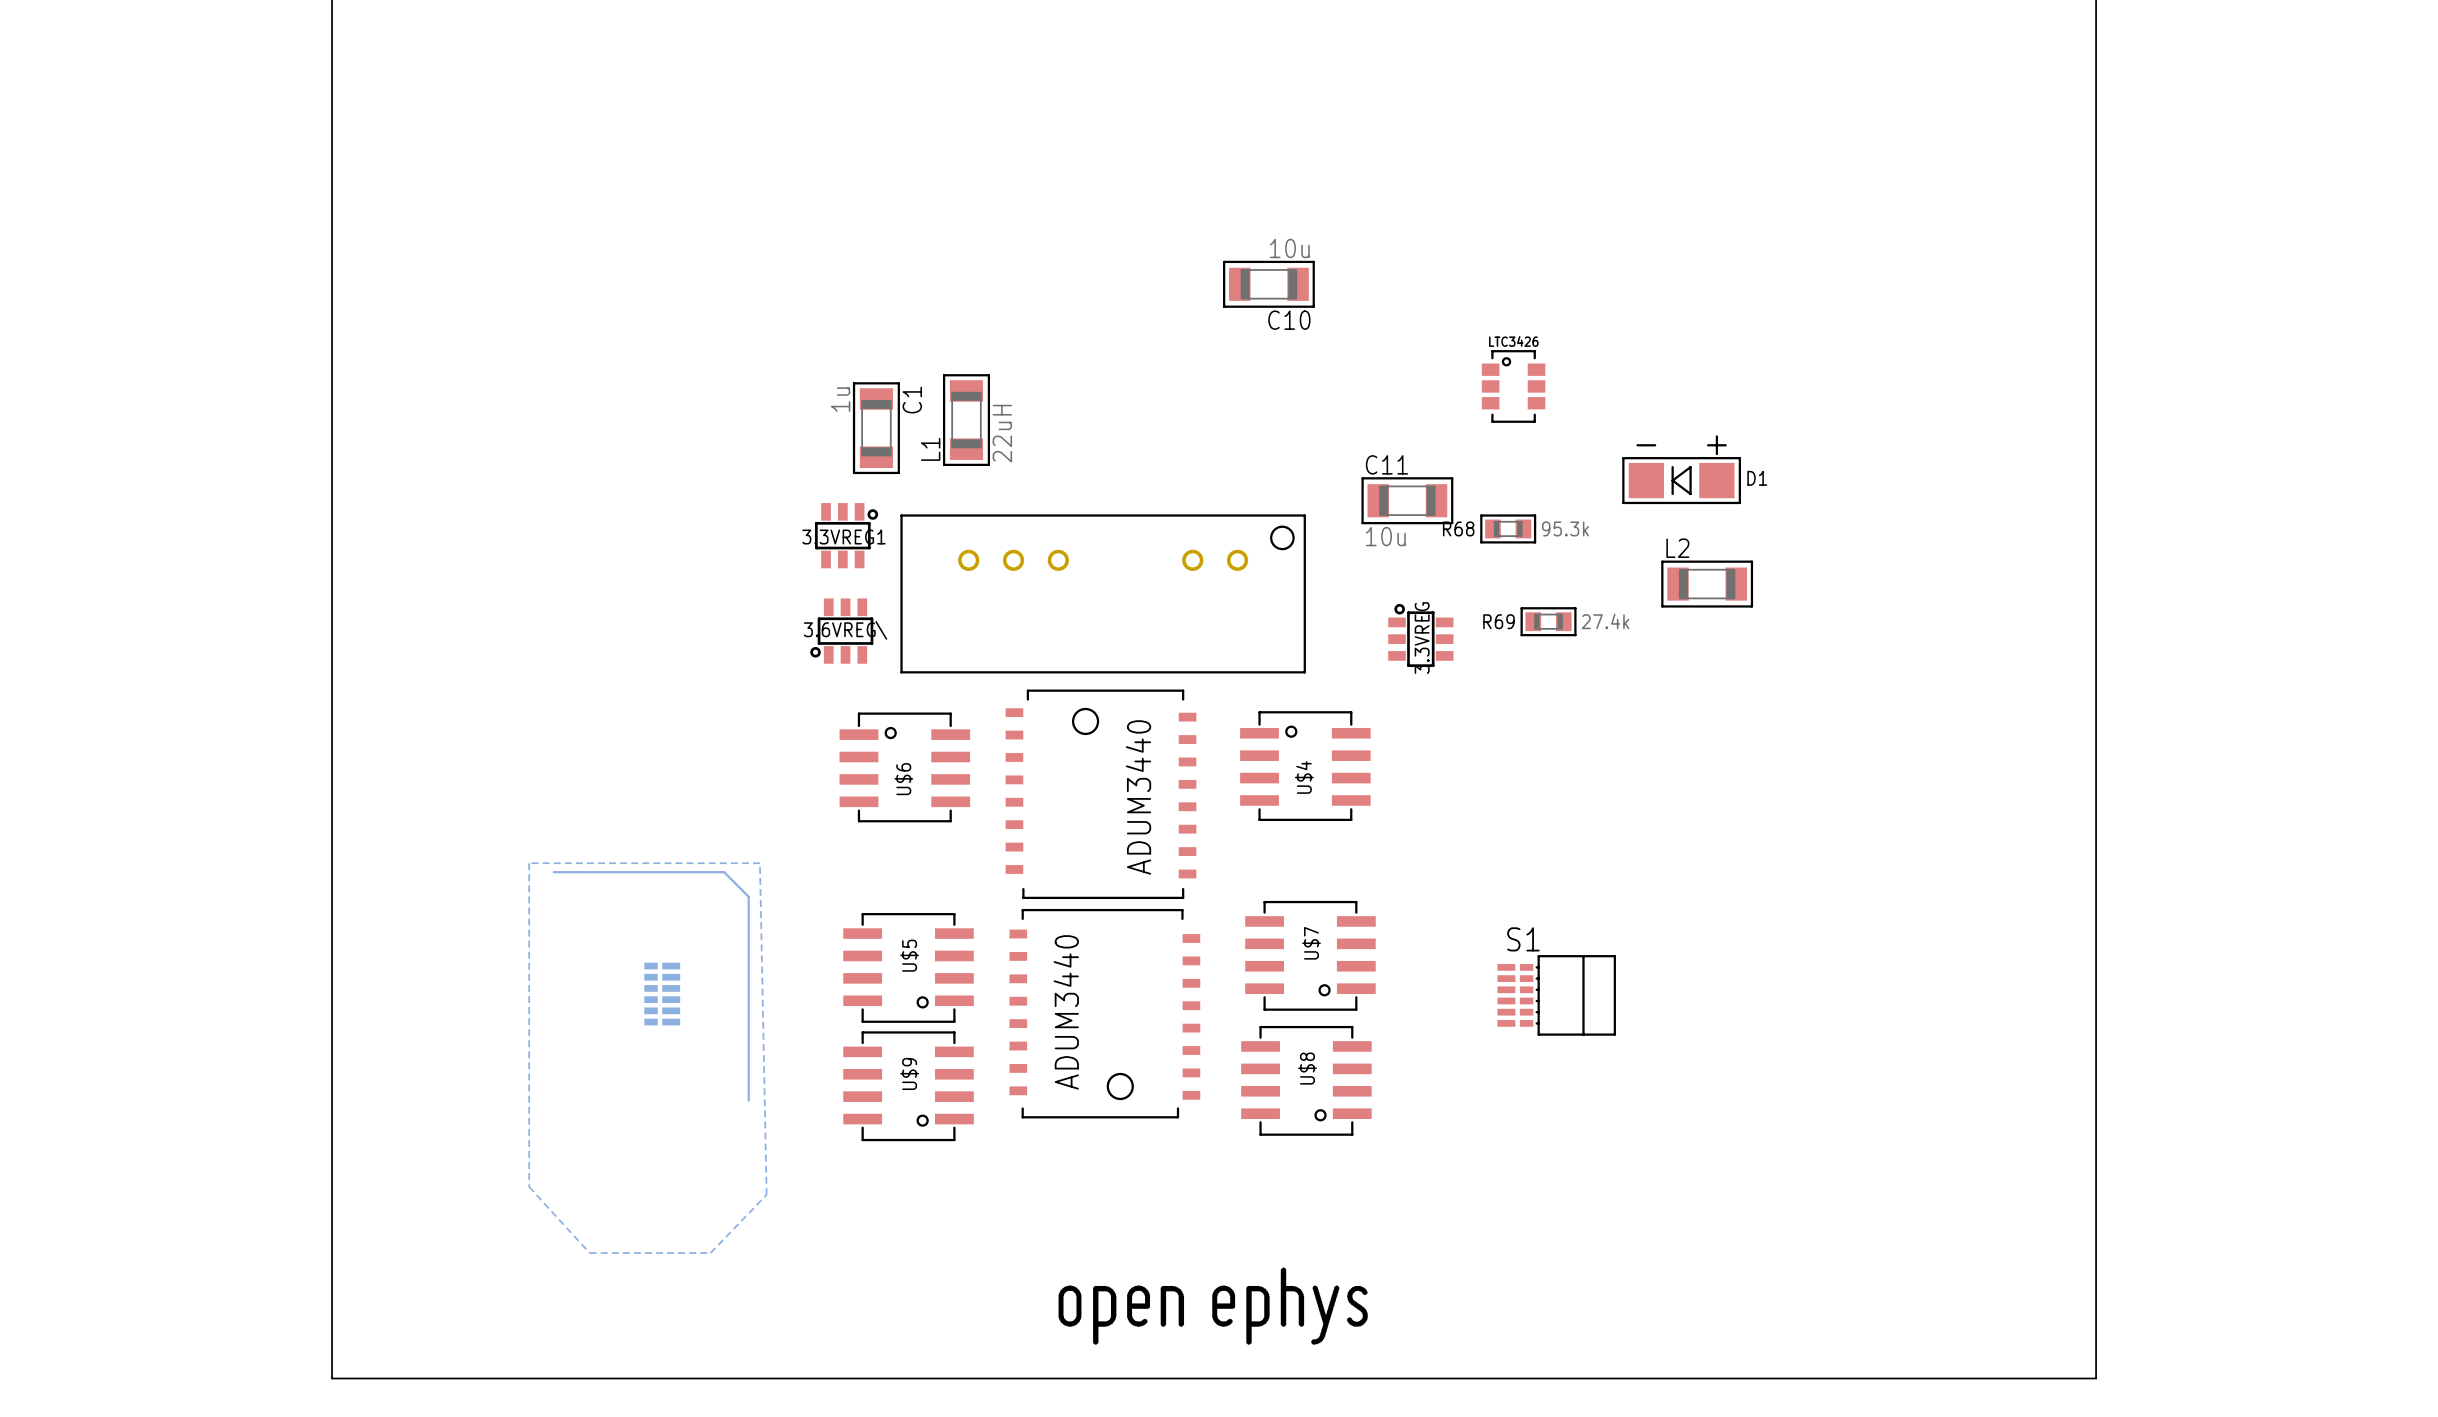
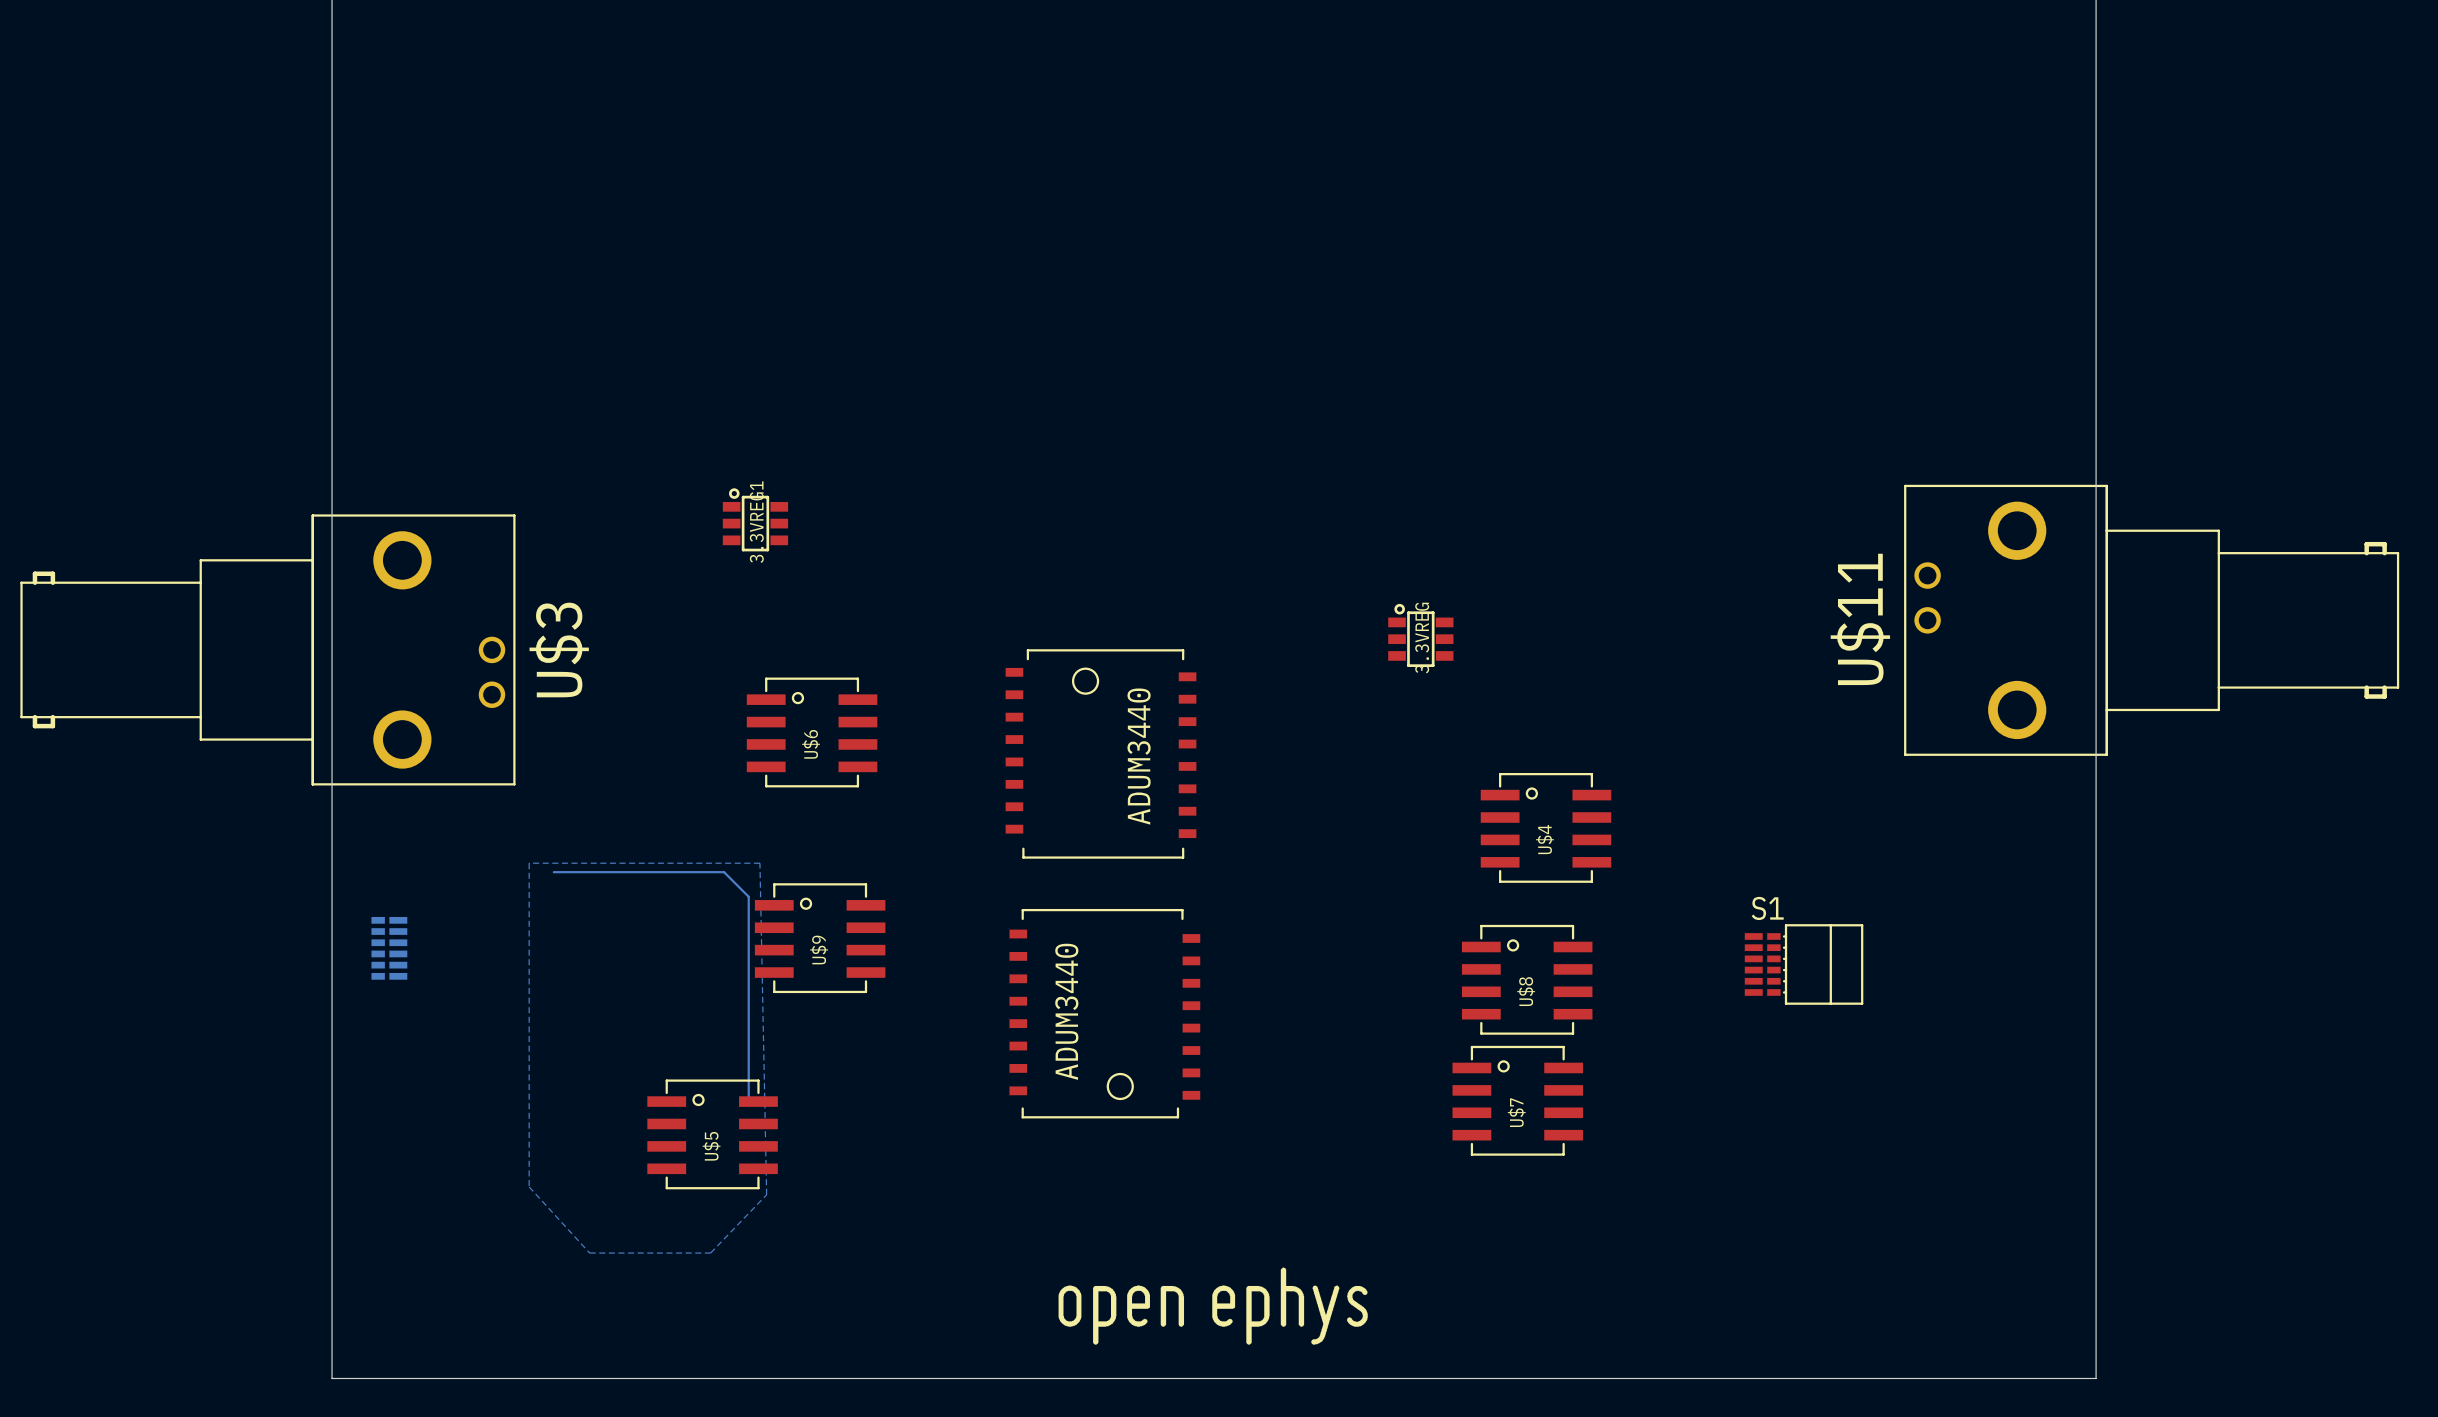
C10: 10u (1268, 284) -> none
part: LTC3426 (1513, 386) -> none
L1: 22uH (966, 420) -> none
C1: 1u (876, 428) -> none
D1: (1681, 469) -> none
C11: 10u (1407, 500) -> none
R68: 95.3k (1508, 528) -> none
3.3VREG1 rotation: 0° (846, 535) -> 90° counterclockwise (755, 519)
3.3VREG1 position: (846, 535) -> (755, 519)
L2: (1707, 584) -> none
part: (1103, 593) -> none
U$11: none -> (2151, 620)
R69: 27.4k (1548, 621) -> none
3.6VREG\: (841, 631) -> none
U$3: none -> (267, 649)
U$4 position: (1305, 766) -> (1546, 827)
U$6 position: (904, 767) -> (812, 732)
part position: (1101, 794) -> (1101, 753)
U$7 rotation: 0° (1310, 955) -> 180° (1517, 1100)
U$7 position: (1310, 955) -> (1517, 1100)
U$5 rotation: 0° (908, 967) -> 180° (712, 1134)
U$5 position: (908, 967) -> (712, 1134)
part position: (662, 994) -> (389, 948)
S1 position: (1556, 995) -> (1804, 964)
U$8 rotation: 0° (1306, 1080) -> 180° (1527, 979)
U$8 position: (1306, 1080) -> (1527, 979)
U$9 rotation: 0° (908, 1086) -> 180° (820, 938)
U$9 position: (908, 1086) -> (820, 938)

